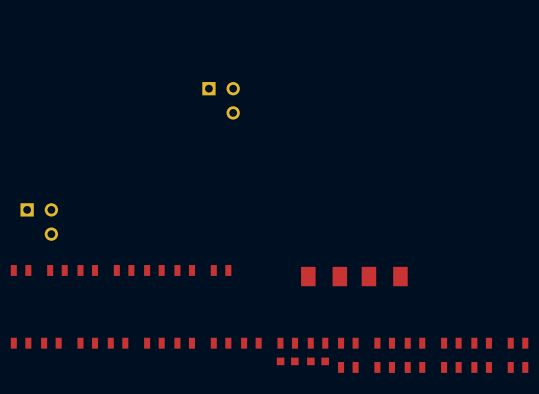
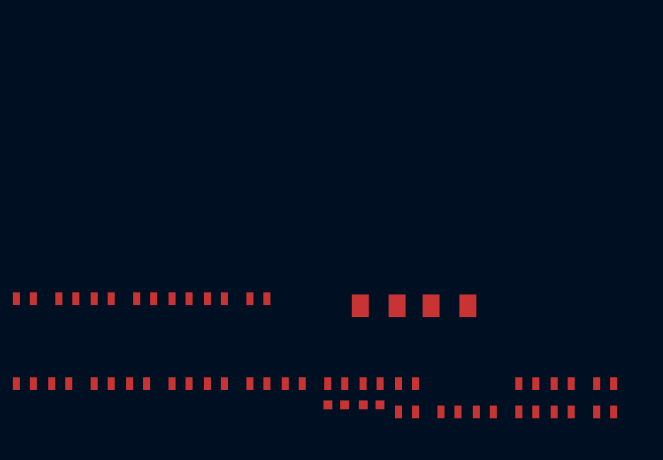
part: (221, 100) -> none
part: (39, 222) -> none
part: (384, 343) -> none
part: (414, 343) -> none

